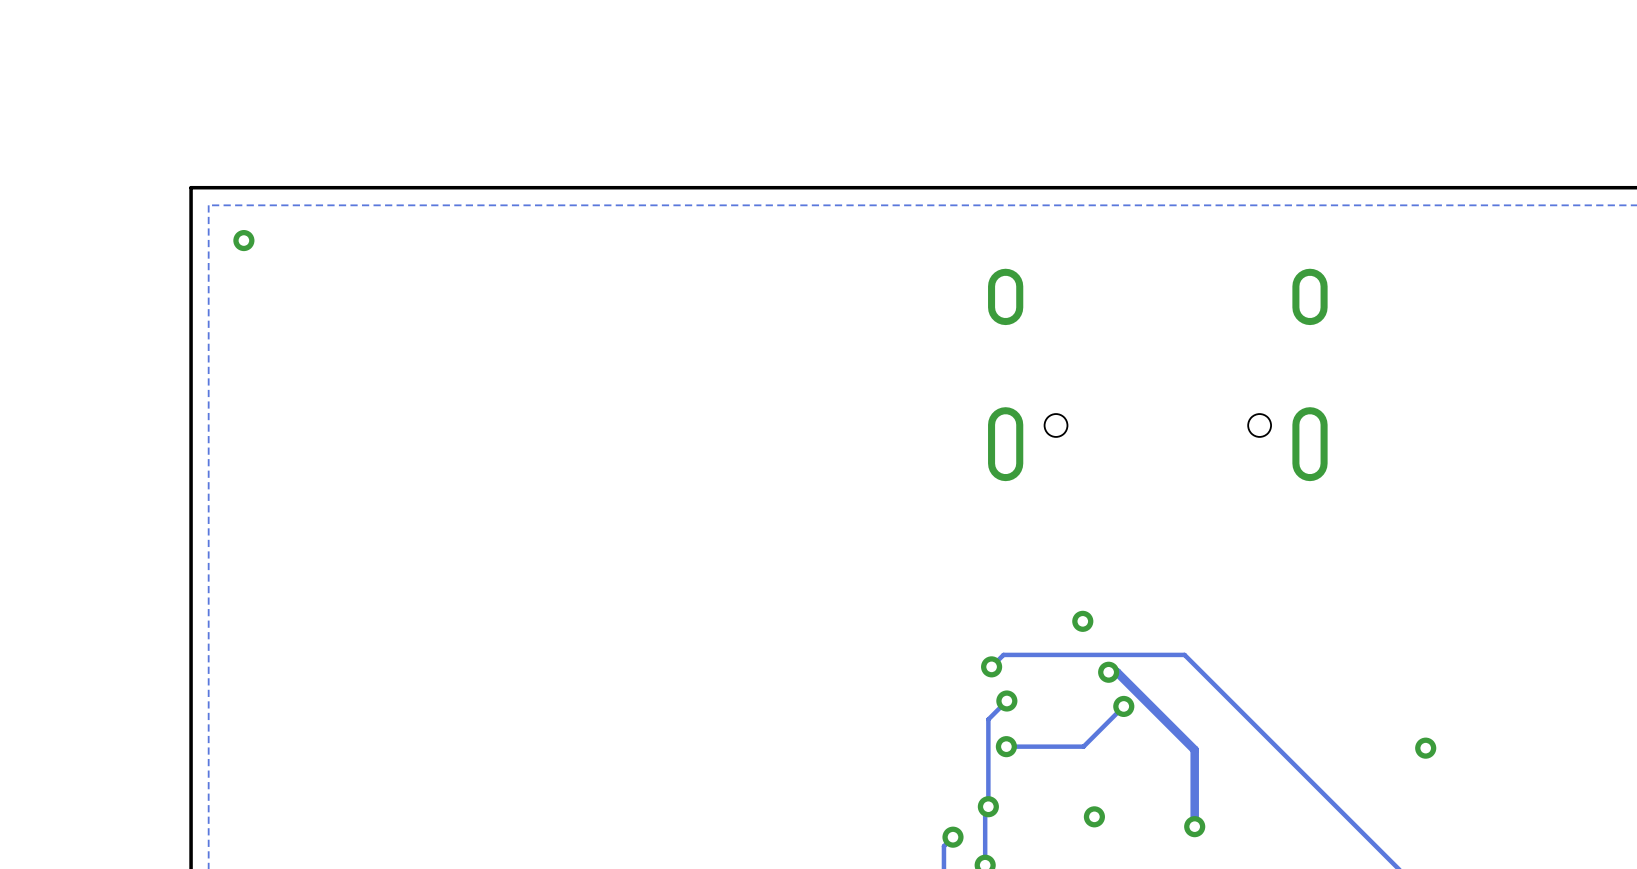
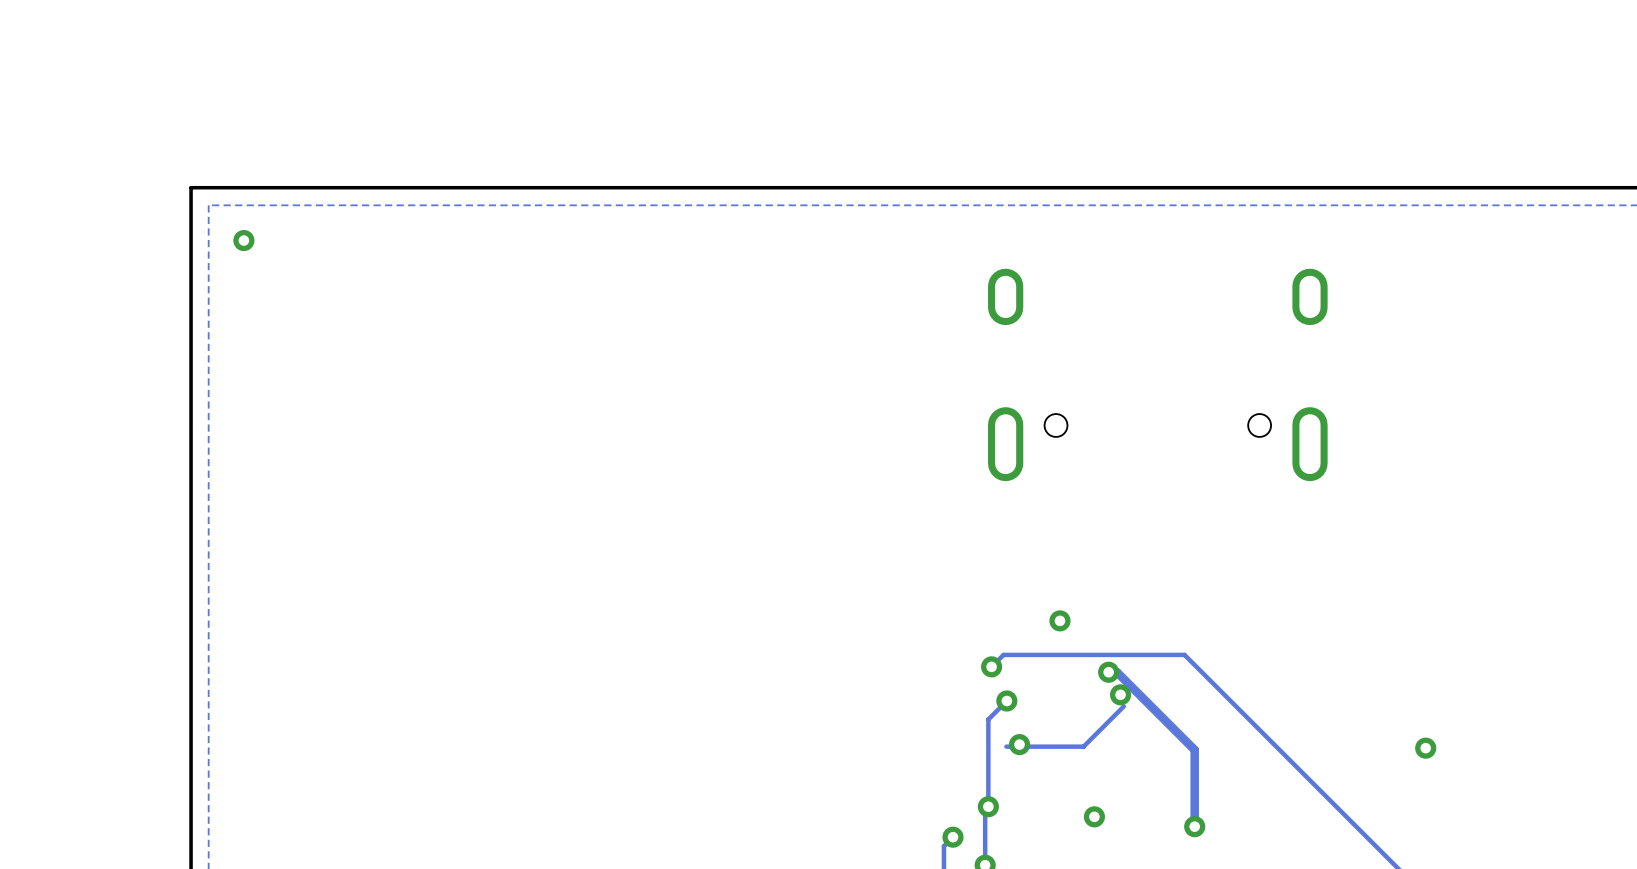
via position: (1082, 621) -> (1059, 620)
via position: (1123, 706) -> (1120, 694)
via position: (1006, 746) -> (1019, 744)

